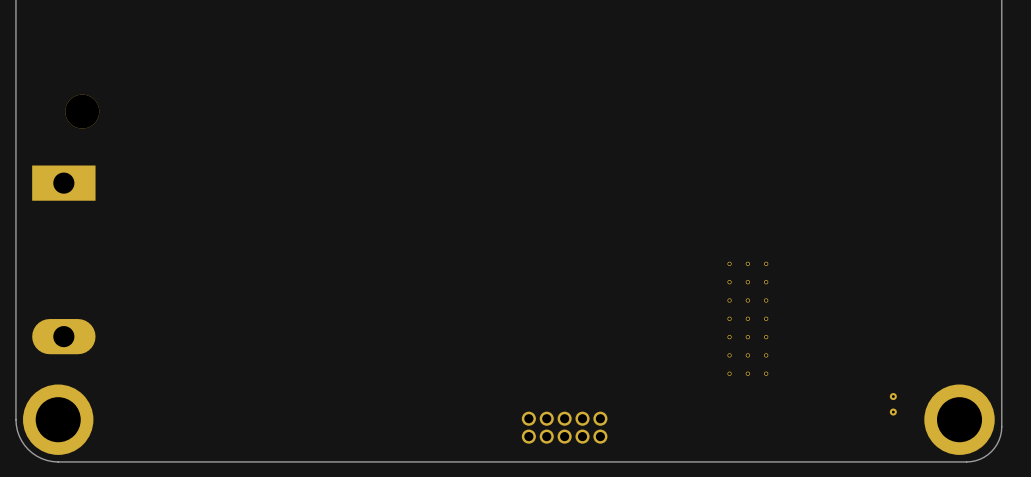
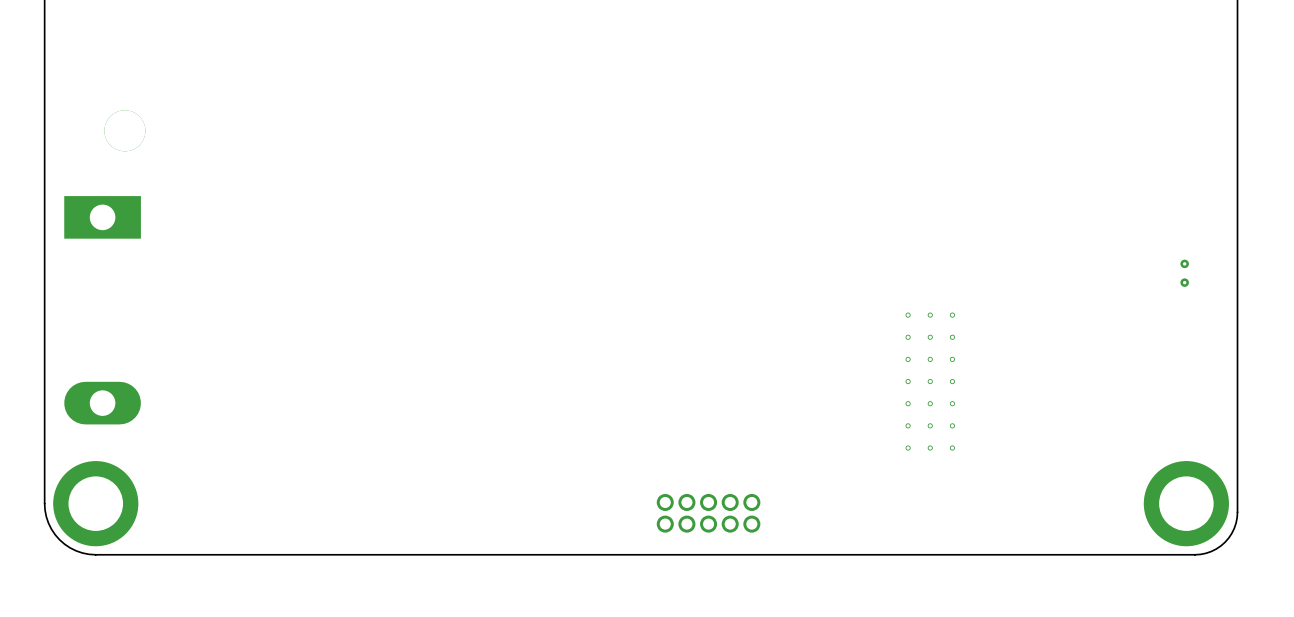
part position: (893, 404) -> (1184, 273)

